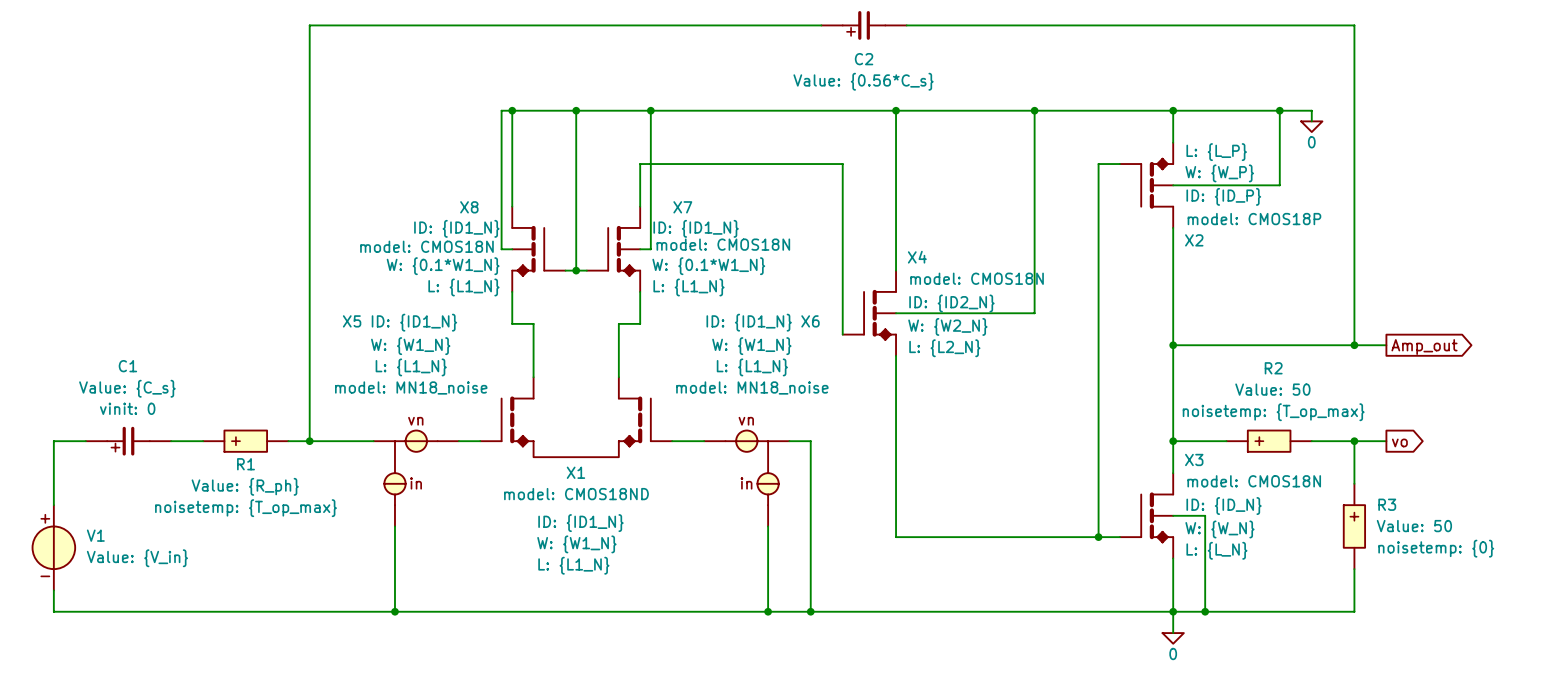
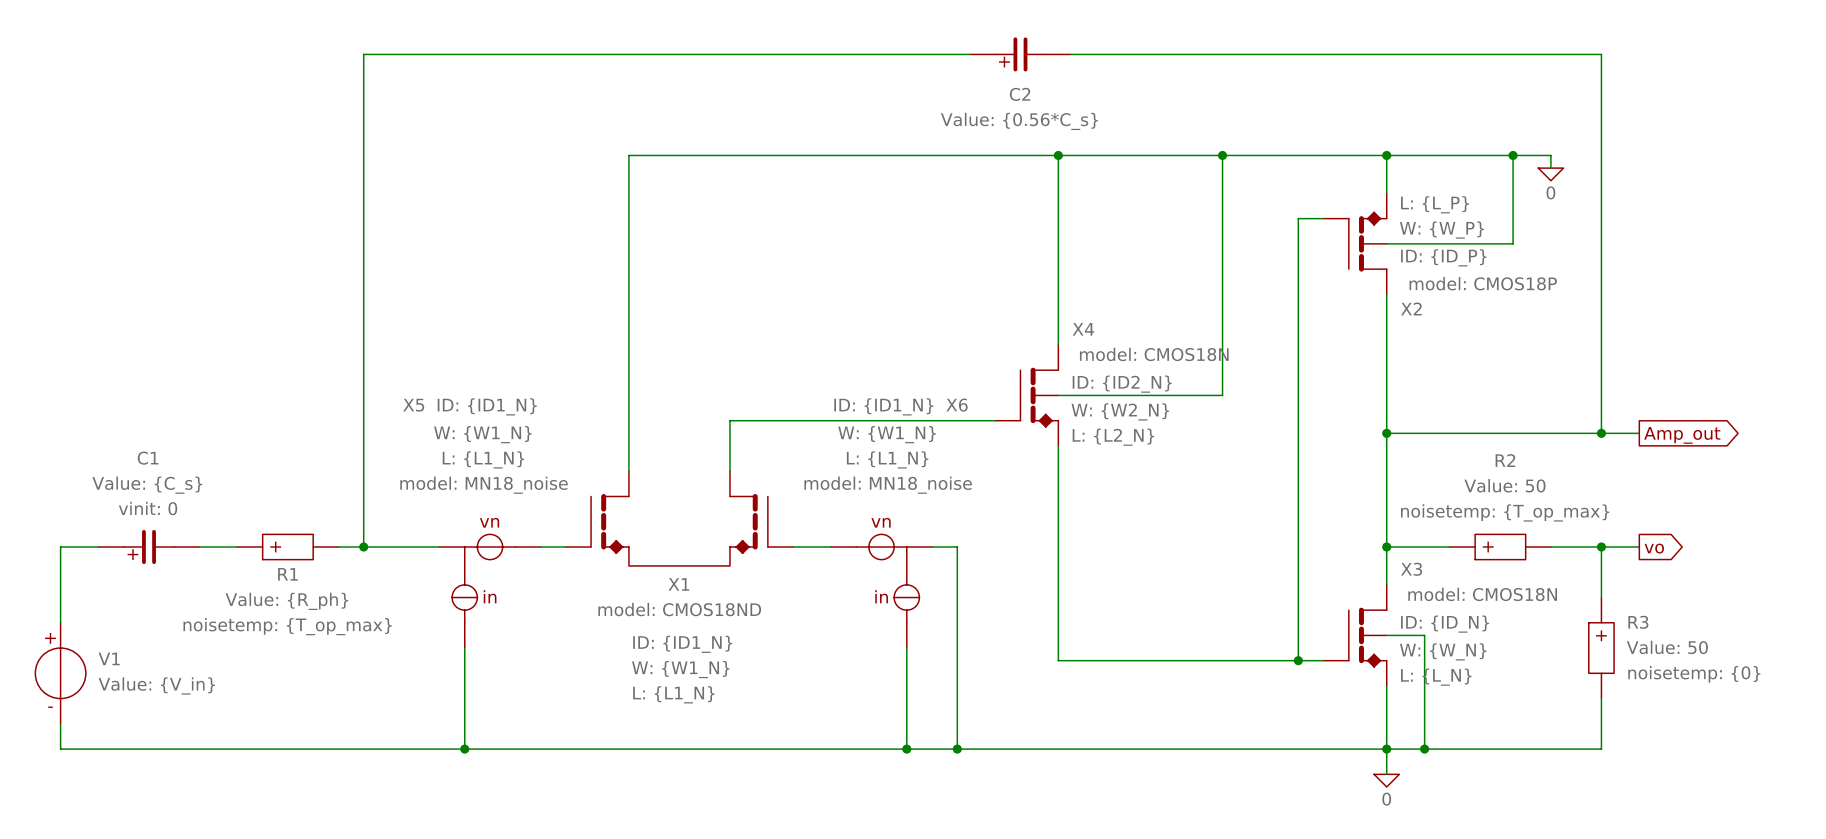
wire: (512, 110) (512, 206) -> none
junction: (512, 110) -> none
wire: (533, 110) (501, 110) (501, 249) (512, 249) -> (628, 155) (628, 408)
wire: (576, 110) (576, 270) -> none
junction: (576, 110) -> none
wire: (650, 110) (650, 249) (640, 249) -> none
junction: (650, 110) -> none
wire: (640, 206) (640, 164) (842, 164) (842, 334) -> (729, 420) (995, 420)
X8: (538, 249) -> none
X7: (613, 249) -> none
wire: (565, 270) (586, 270) -> none
junction: (576, 270) -> none
wire: (512, 291) (512, 323) (533, 323) -> none
wire: (640, 291) (640, 323) (618, 323) (618, 334) -> none

